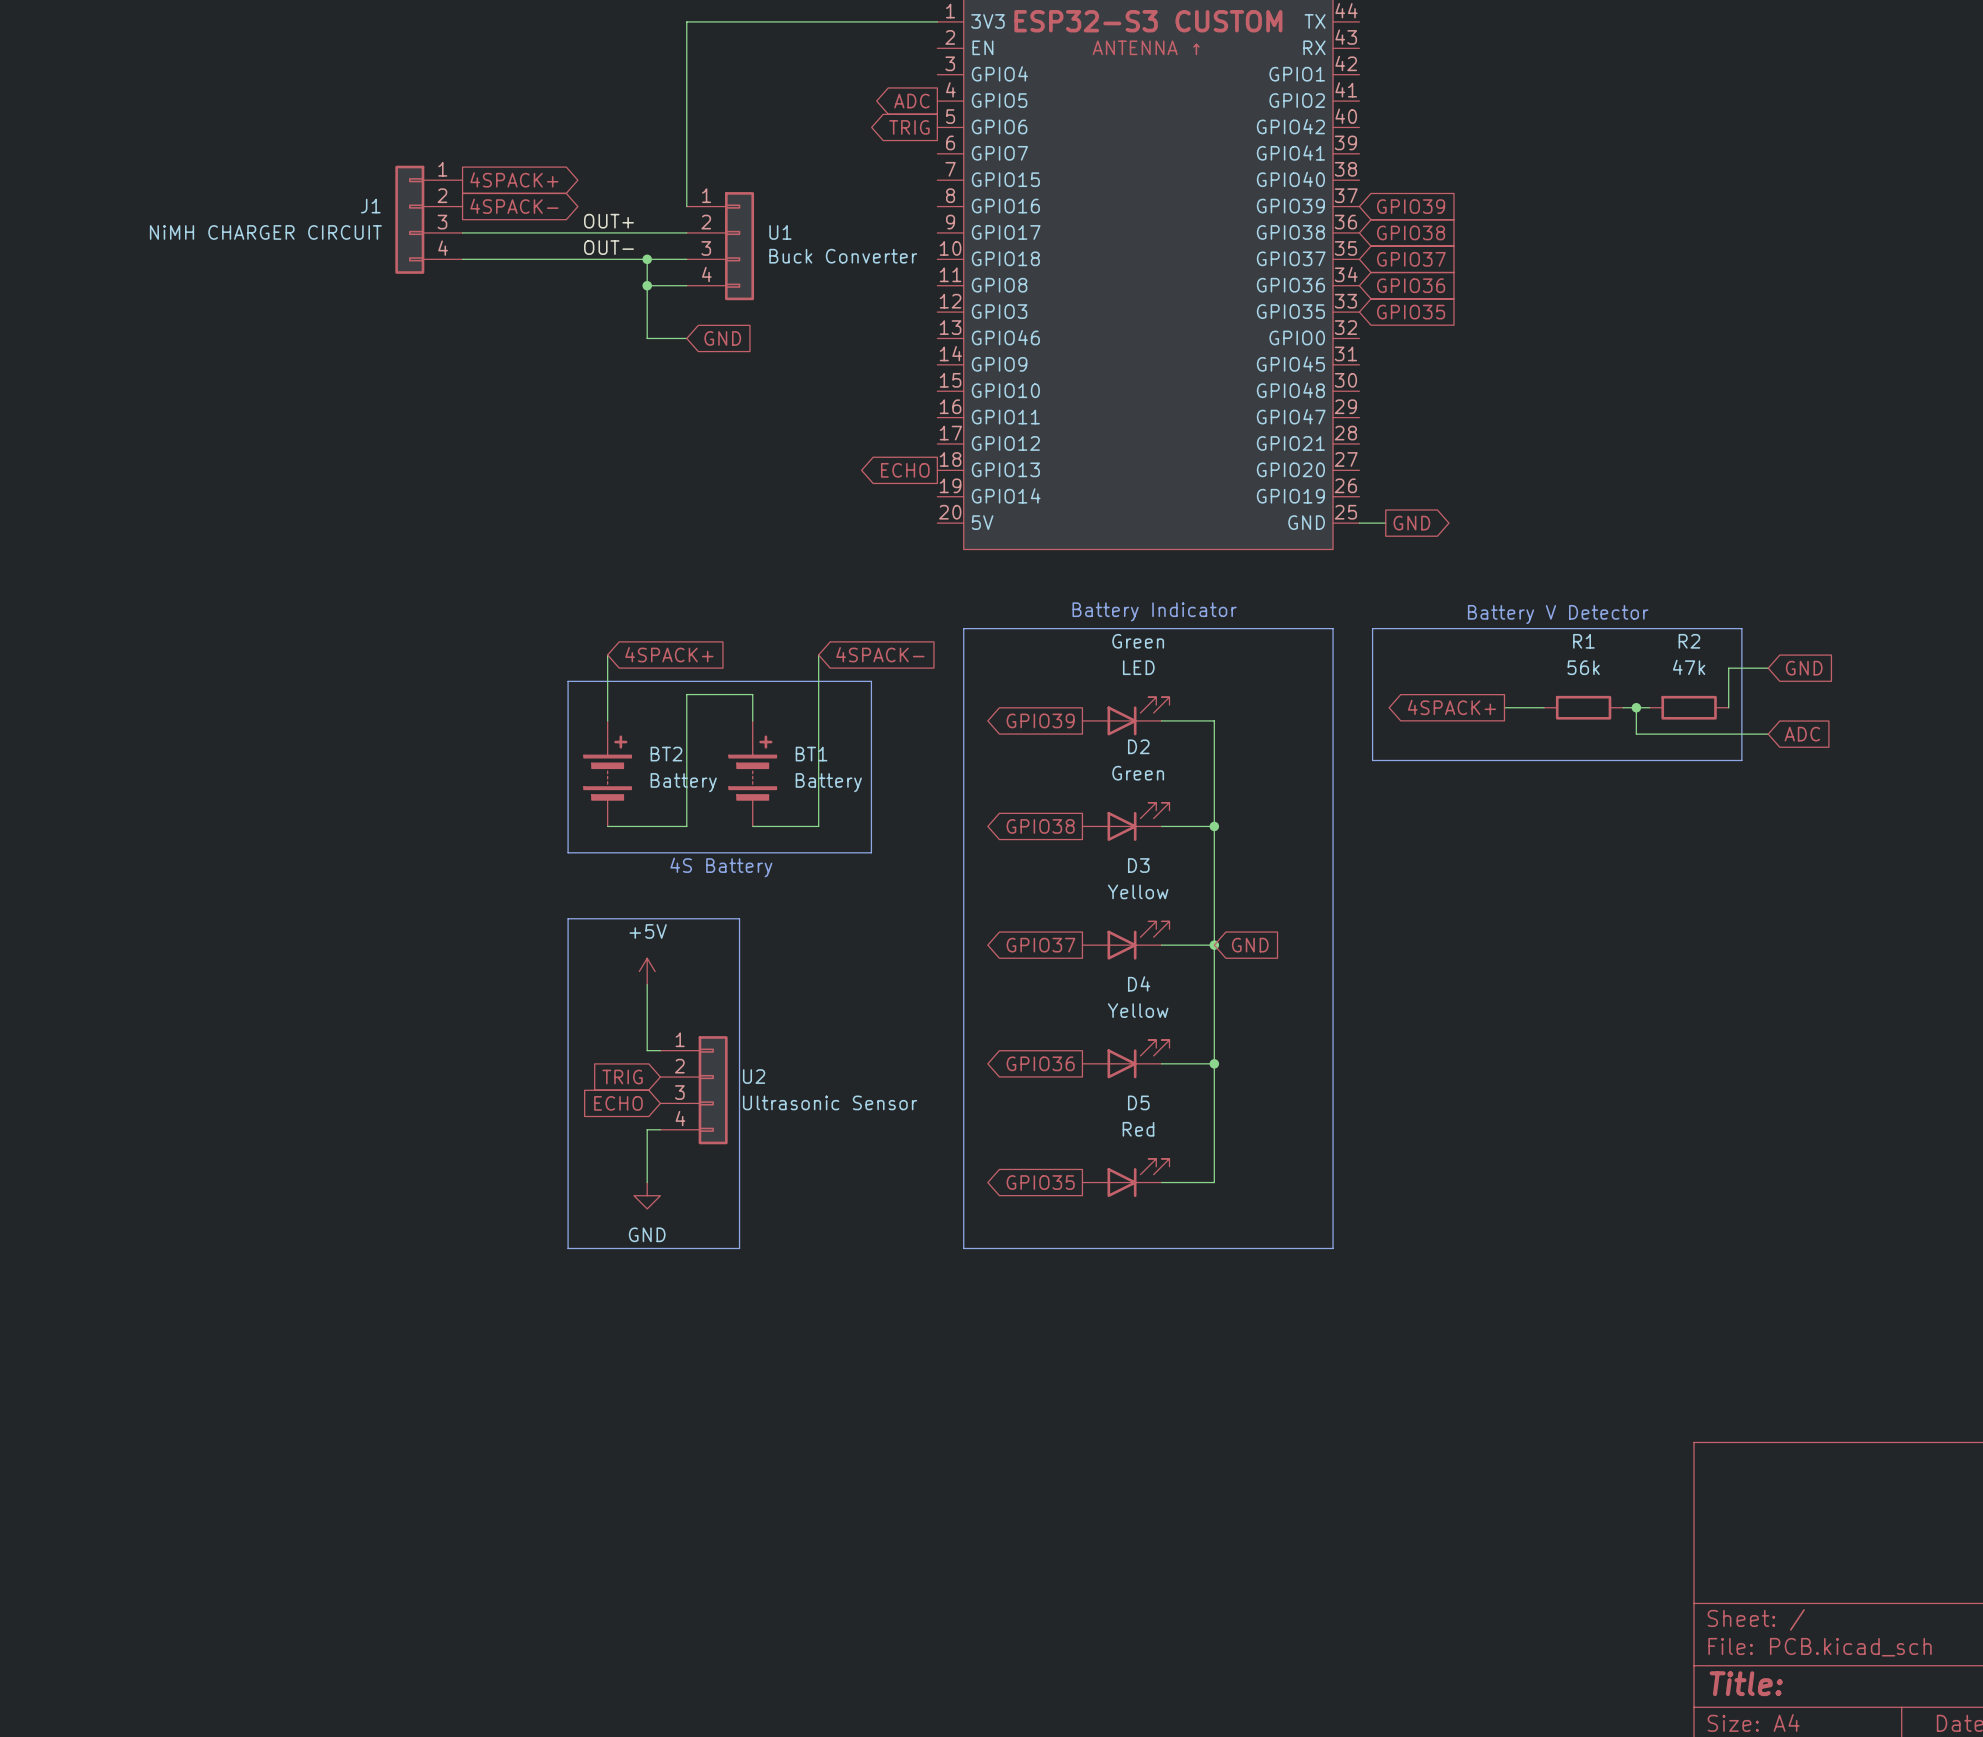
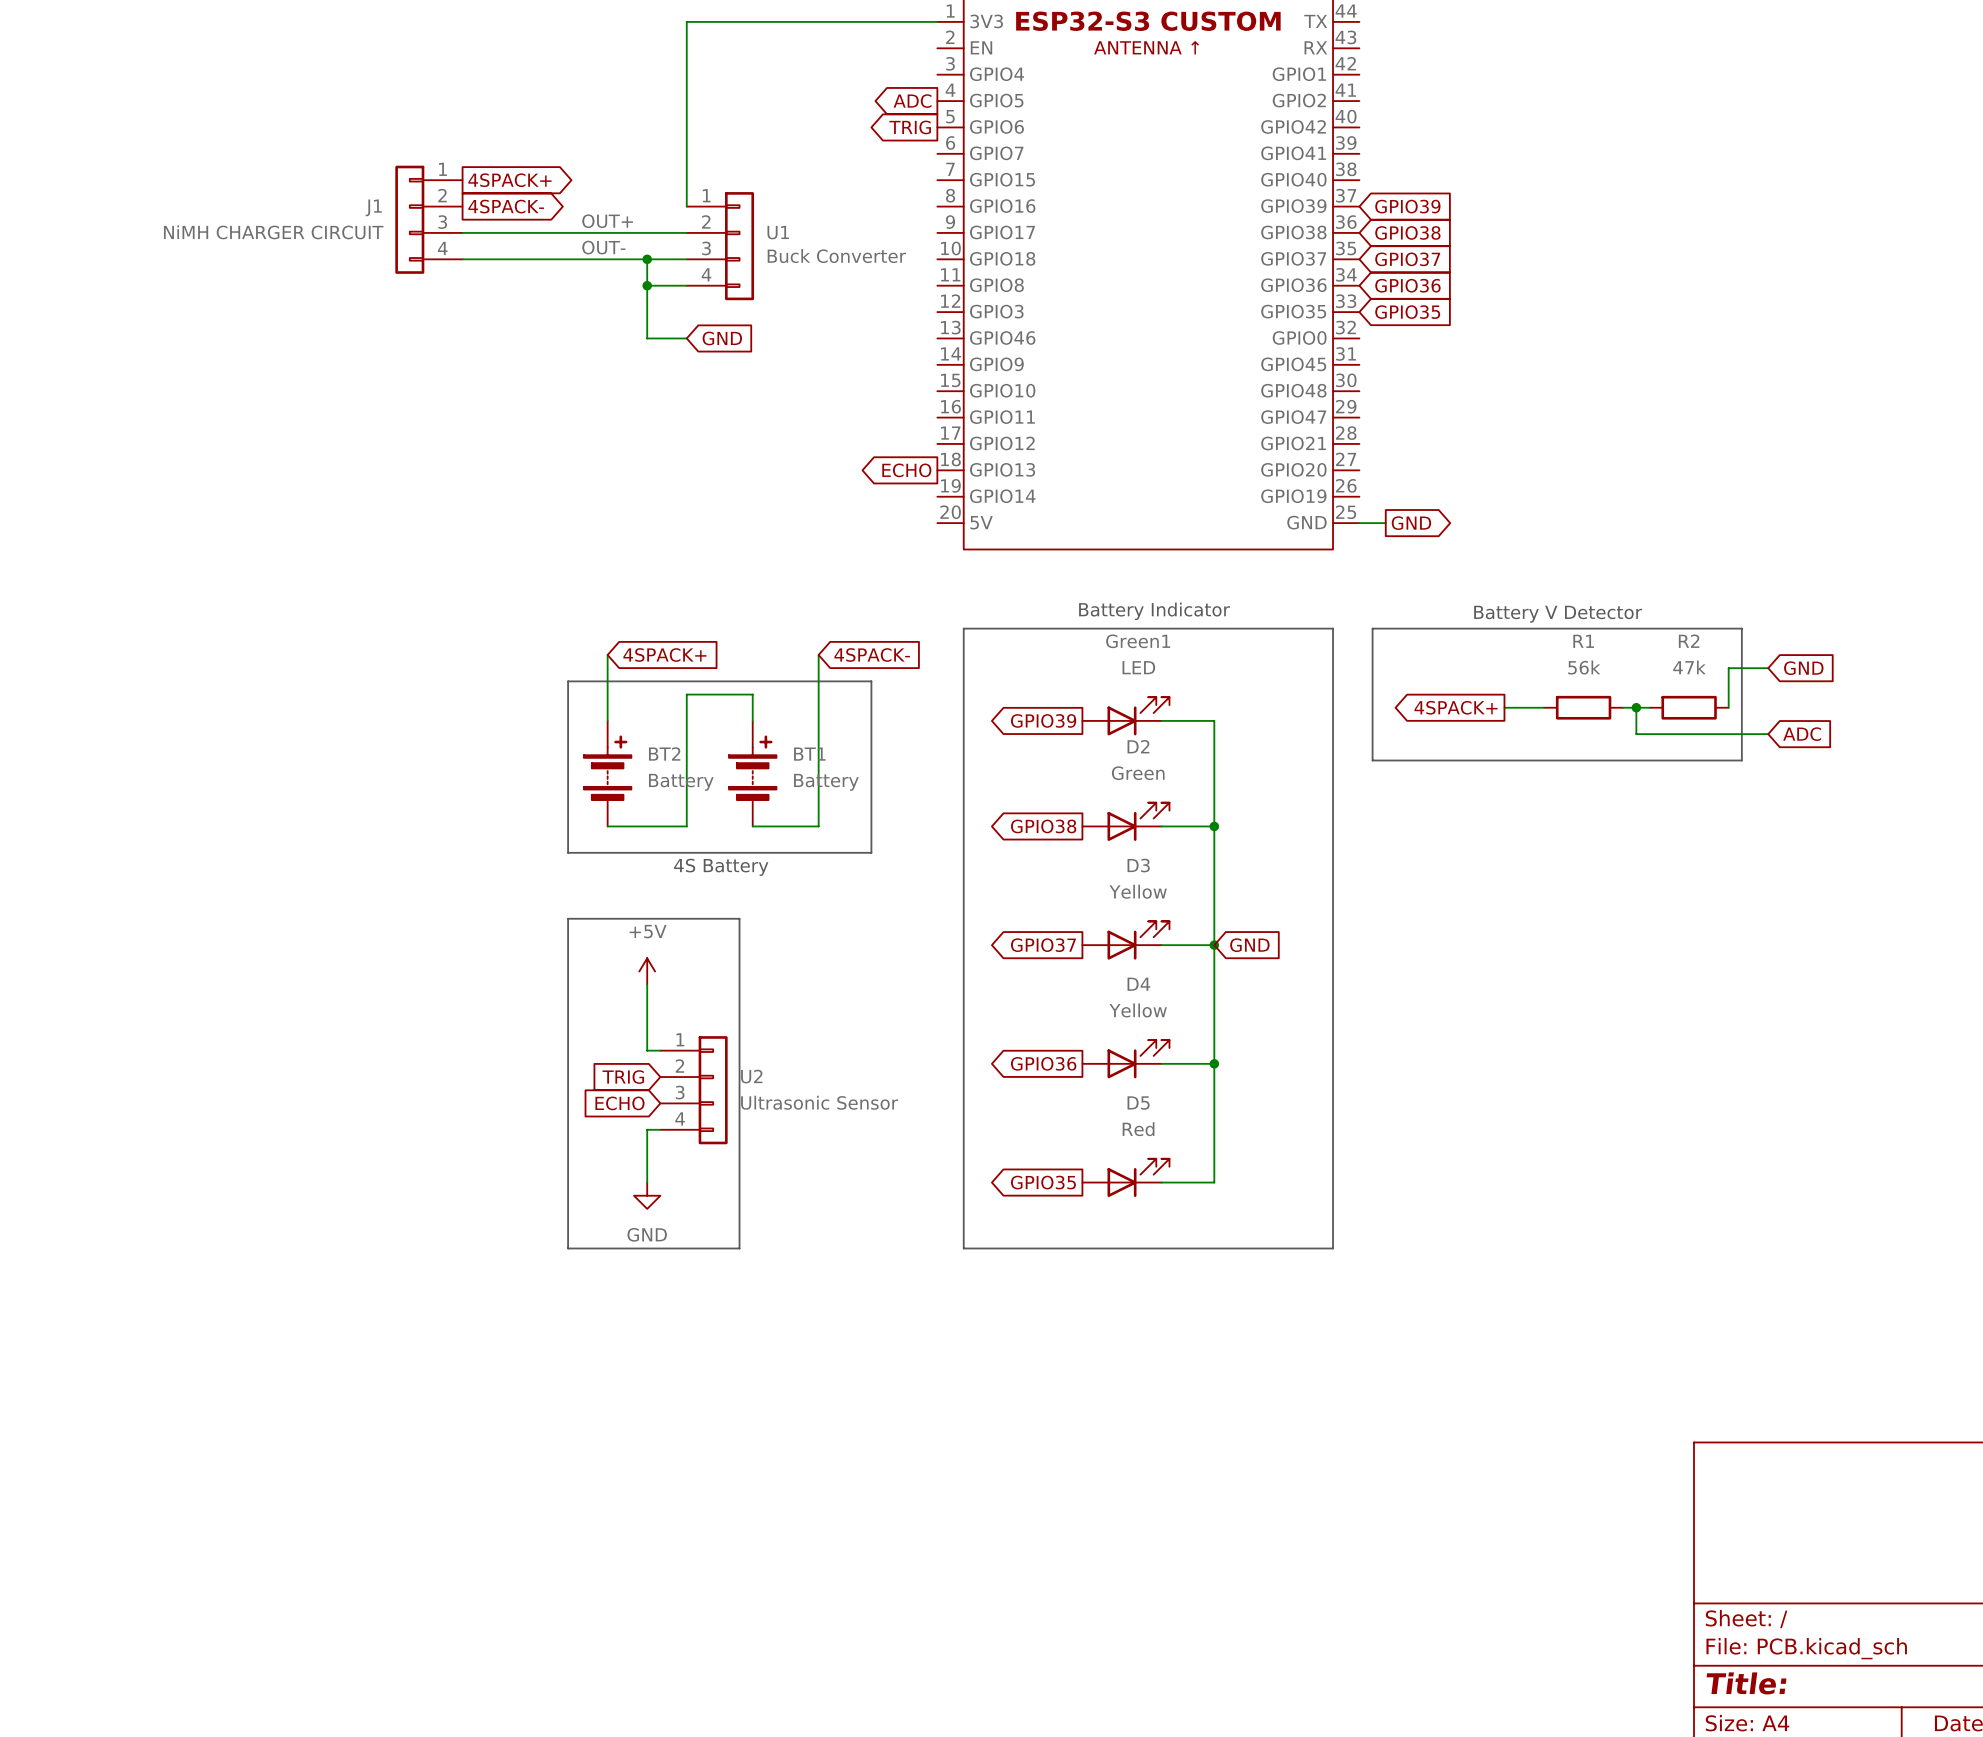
Green name: Green (1138, 641) -> Green1 (1138, 641)

